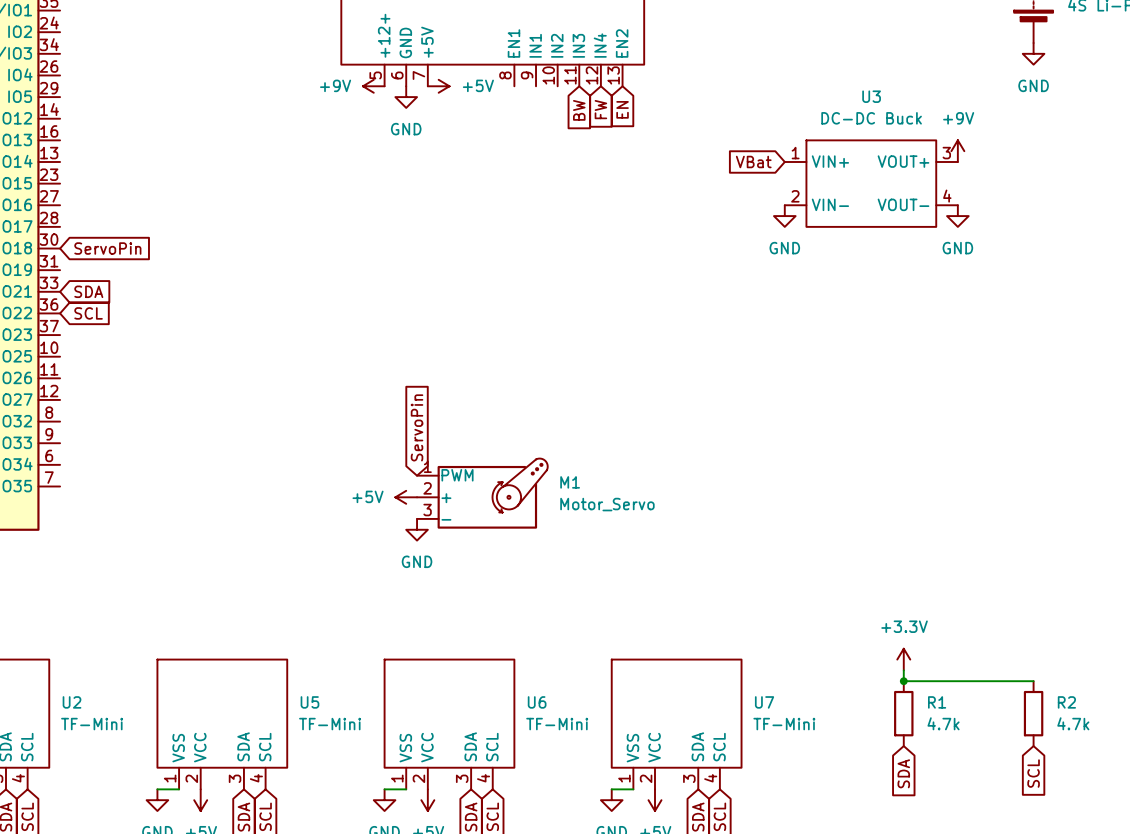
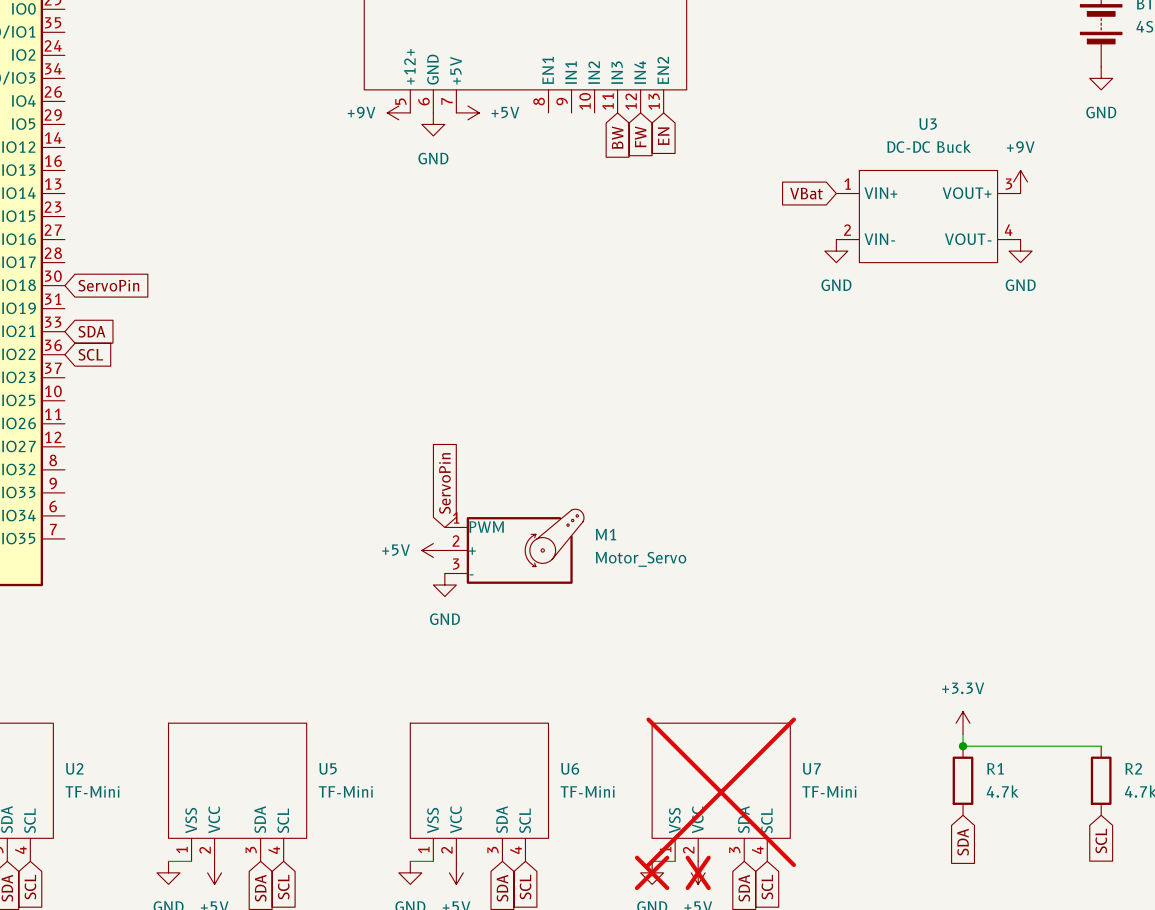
U7 do-not-place cross: none -> (721, 792)
power symbol do-not-place cross: none -> (652, 872)
power symbol do-not-place cross: none -> (698, 872)

